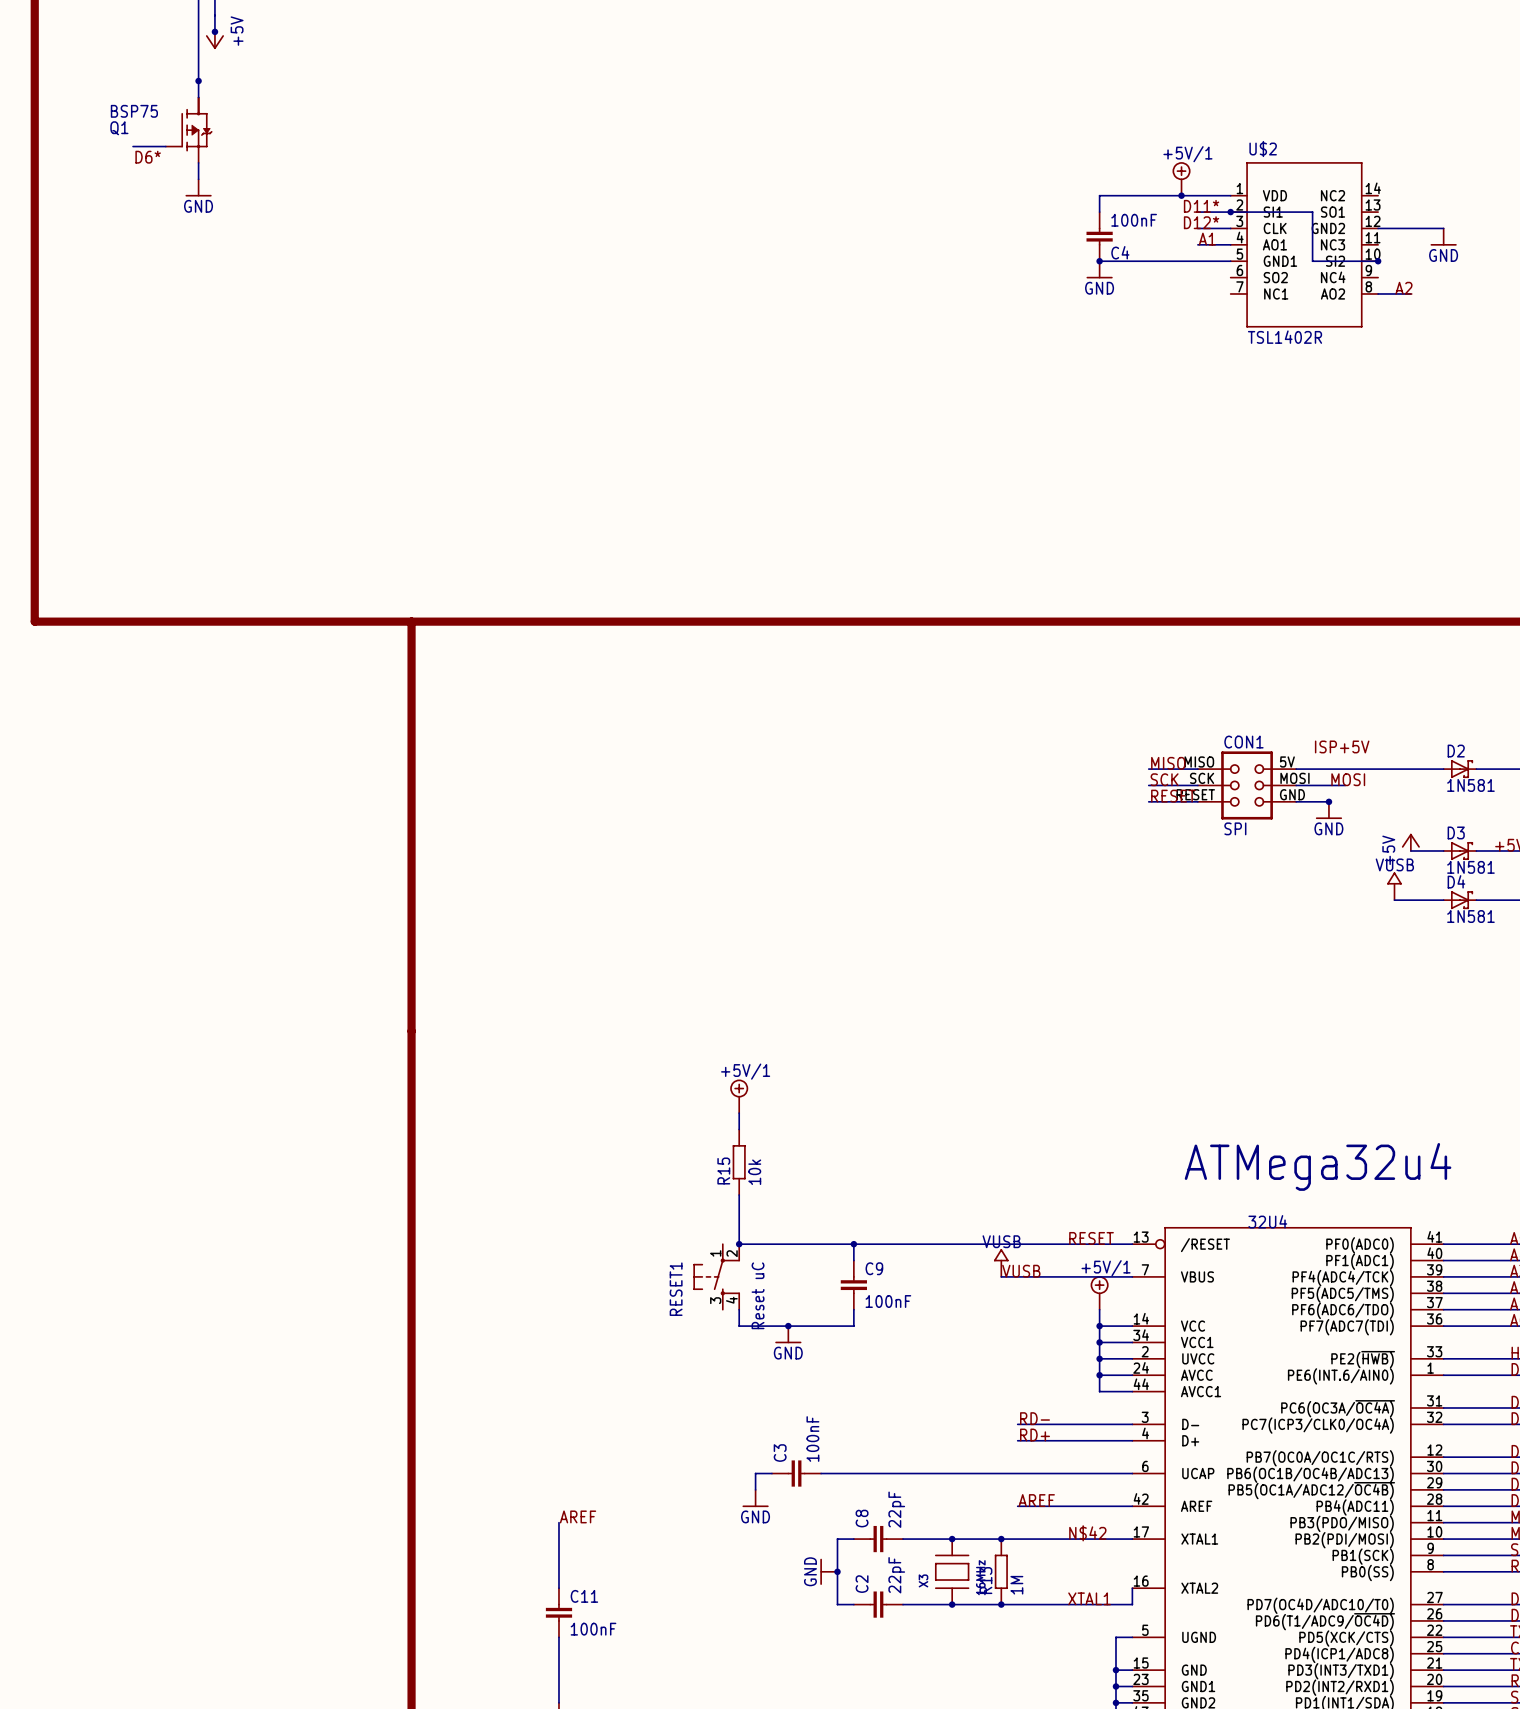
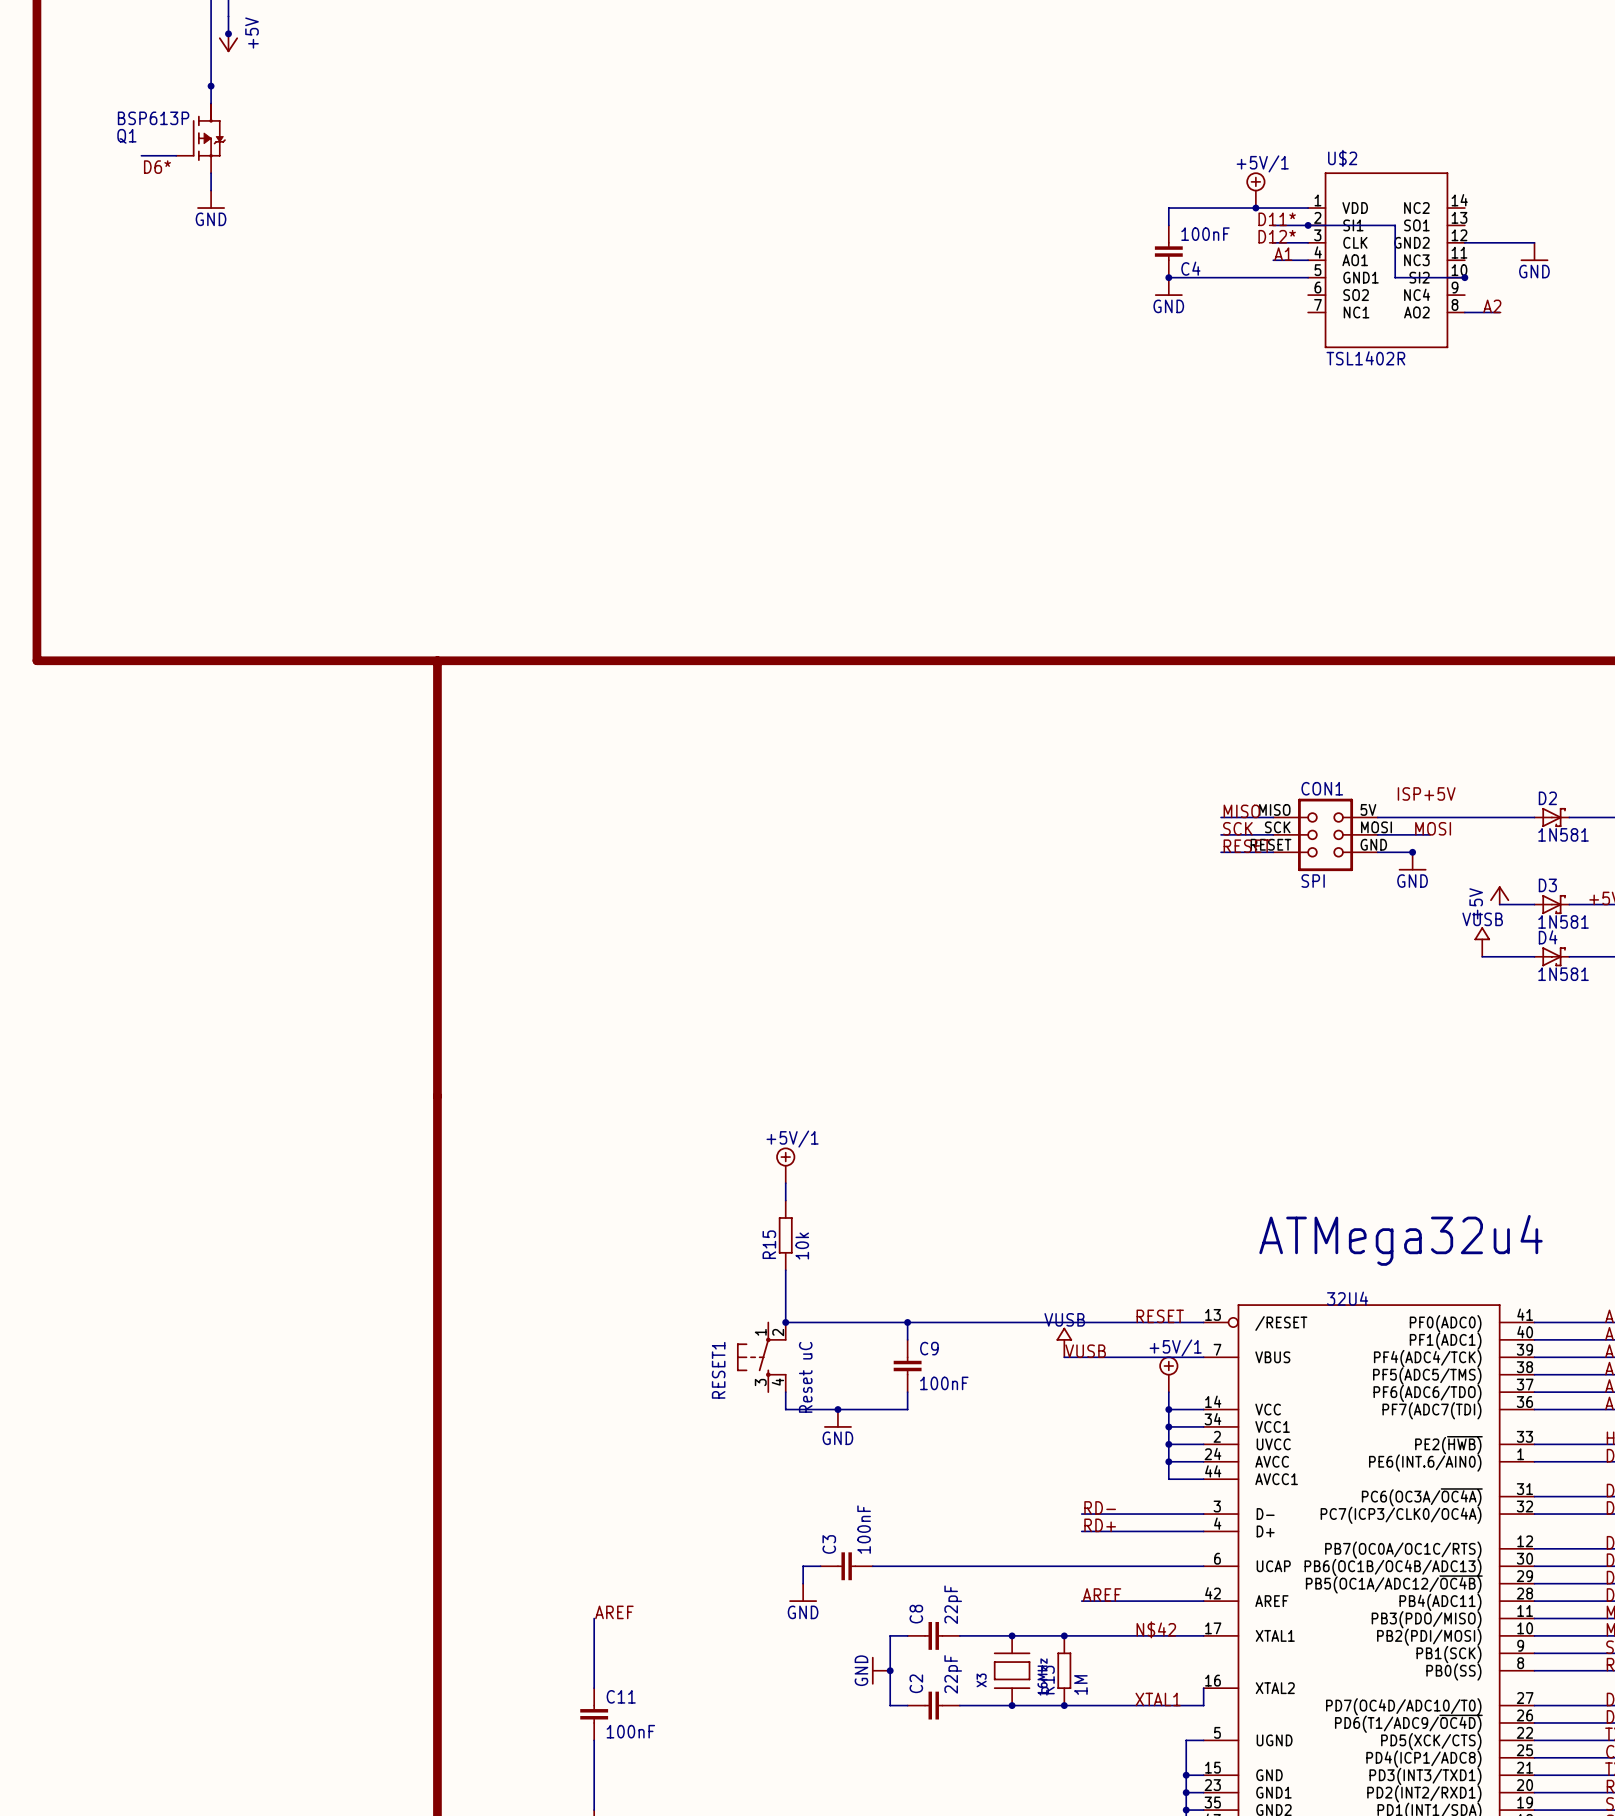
Q1 value: BSP75 (134, 111) -> BSP613P (153, 118)

